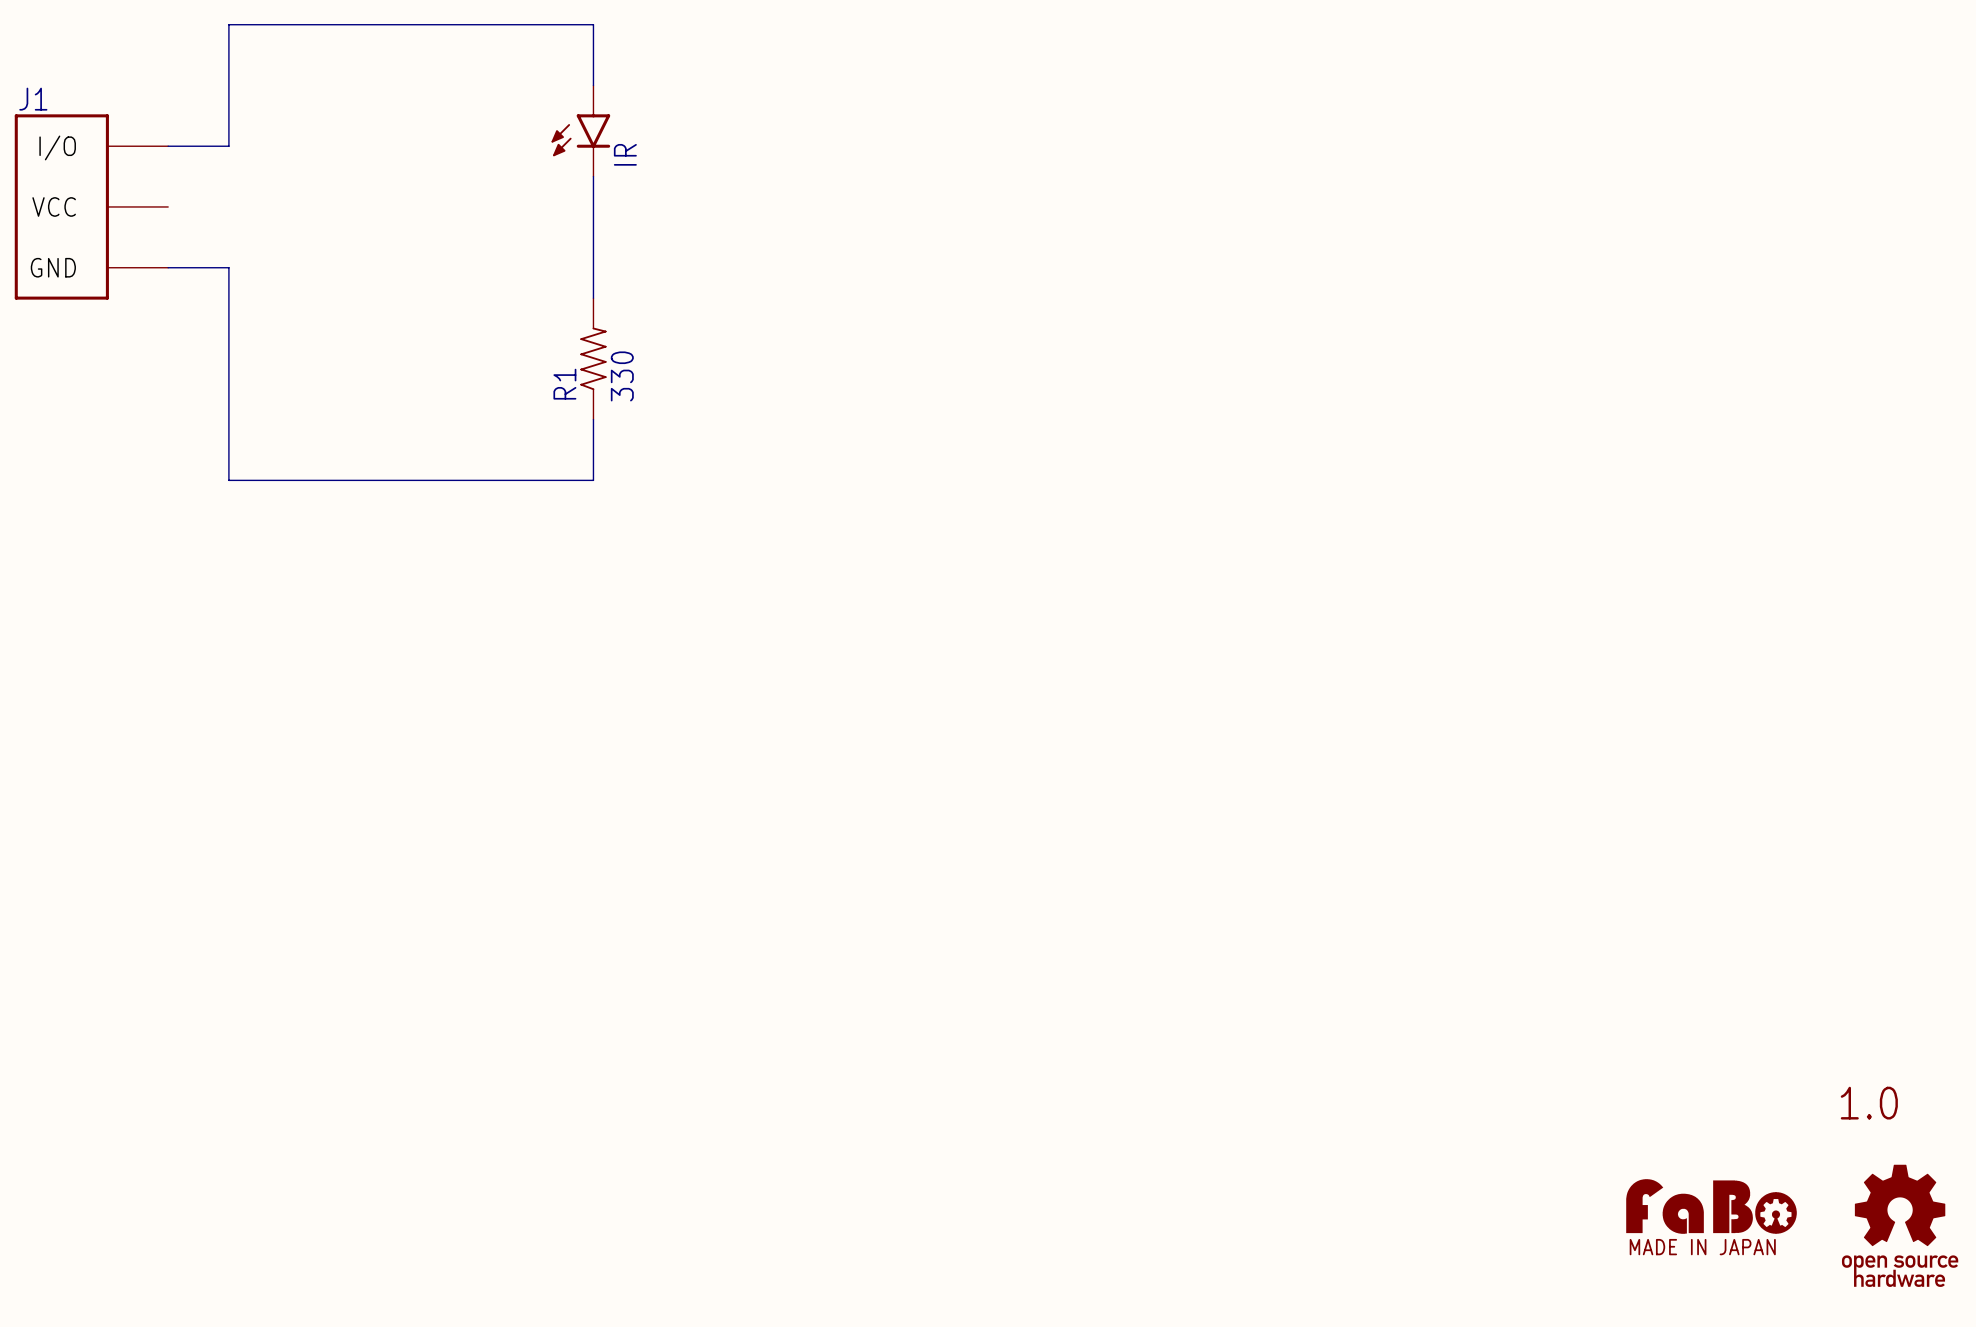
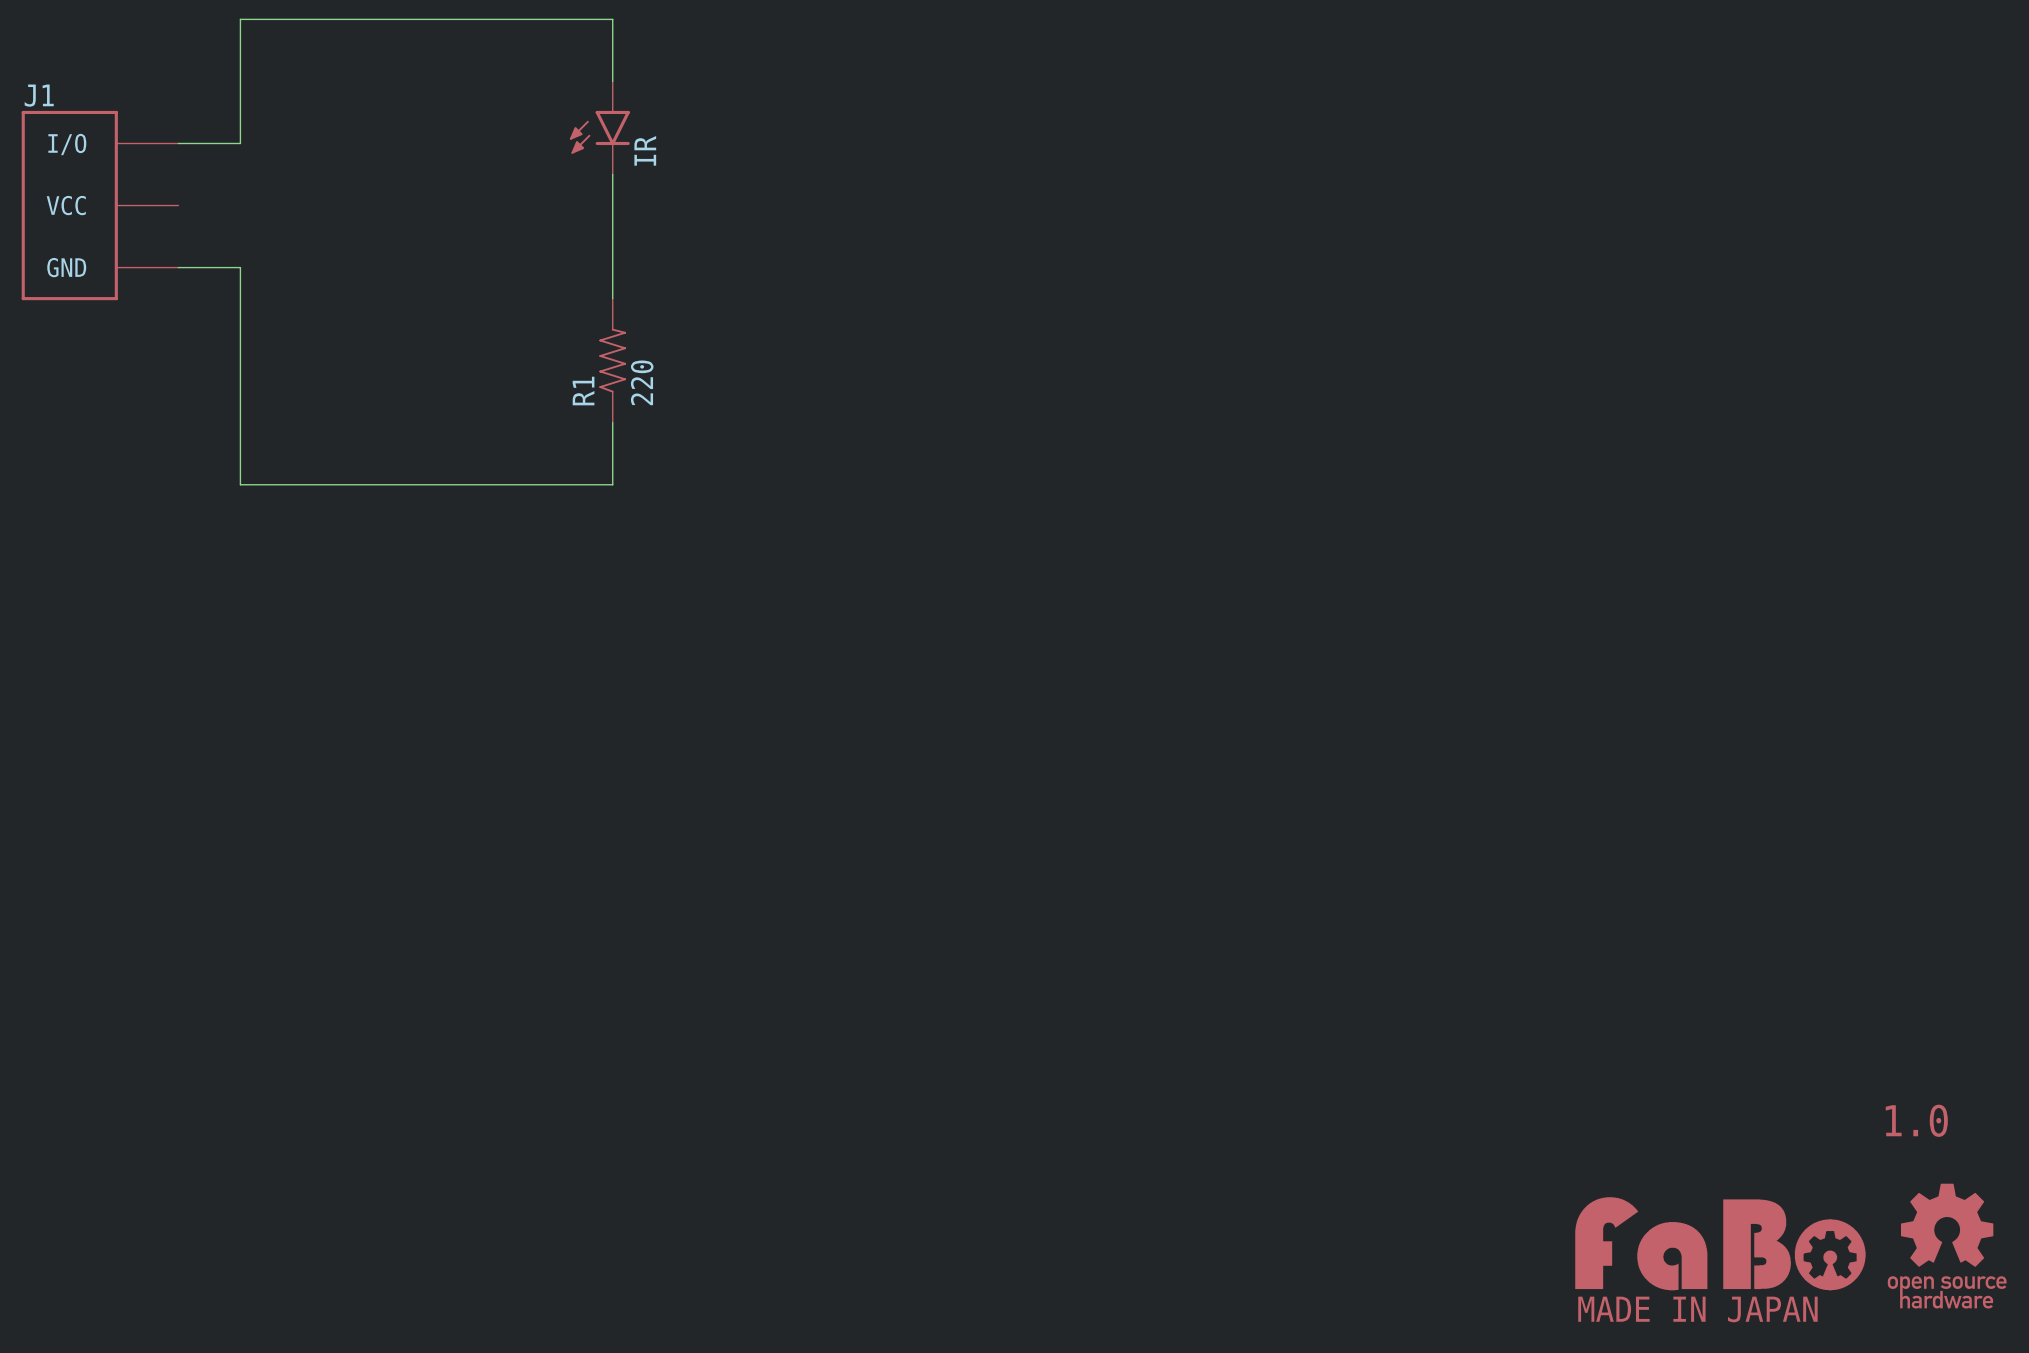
R1 value: 330 (622, 376) -> 220 (642, 382)
part: (1711, 1206) -> none
part: none -> (1720, 1243)

